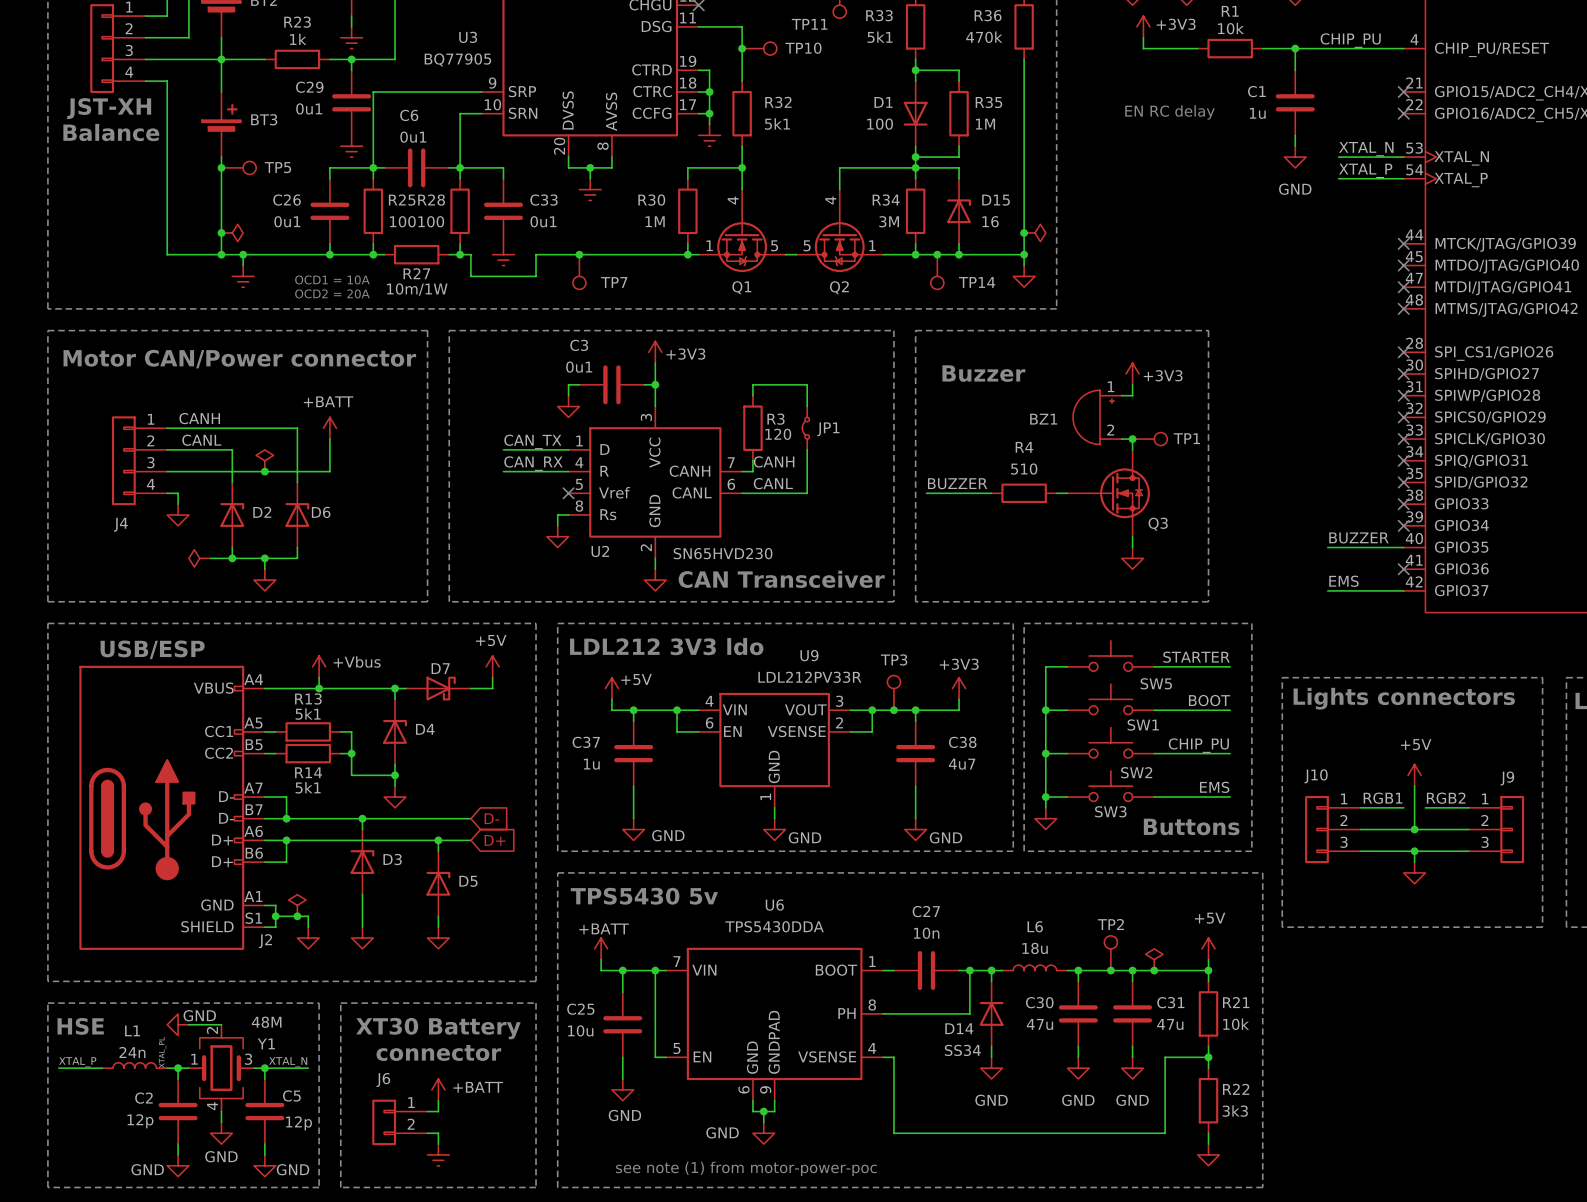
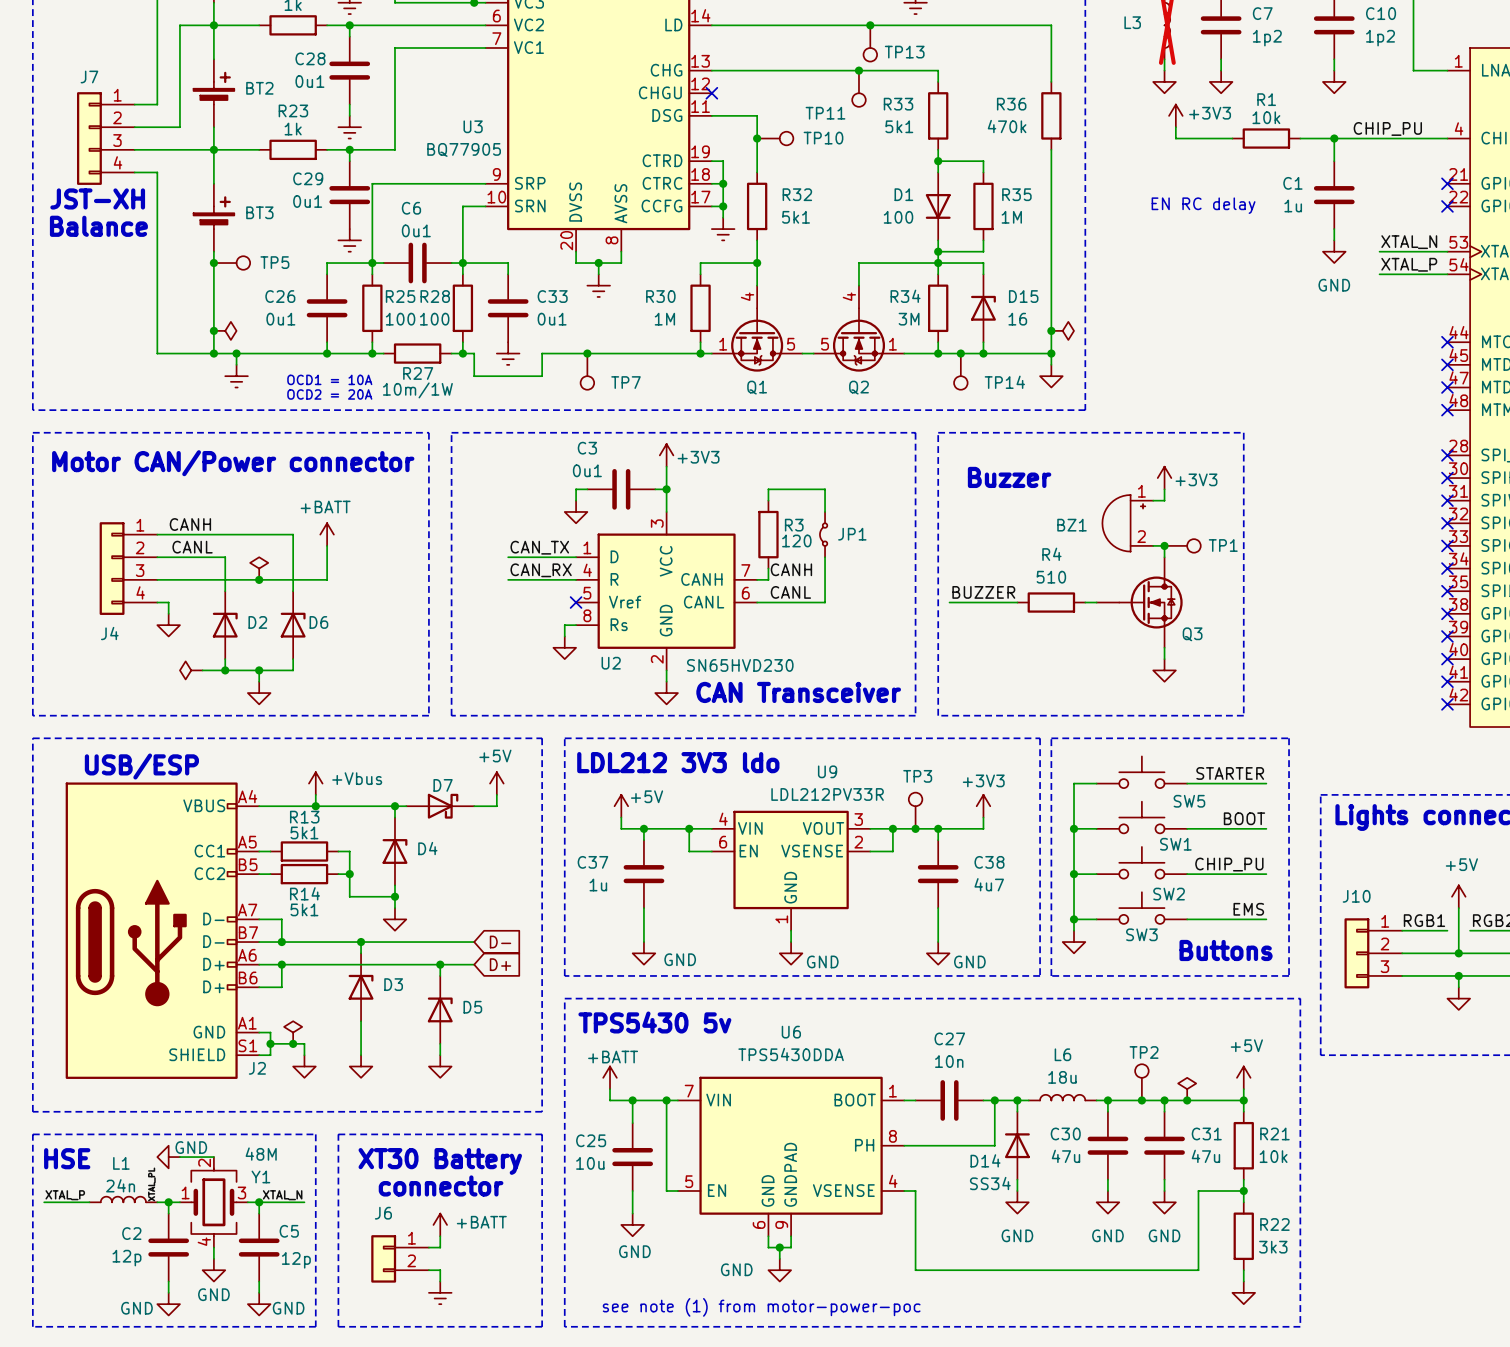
label: BUZZER (1358, 537) -> none
wire: (1327, 547) (1403, 547) -> none
no-connect mark: none -> (1447, 659)
label: EMS (1343, 581) -> none
wire: (1327, 590) (1403, 590) -> none
no-connect mark: none -> (1447, 704)

